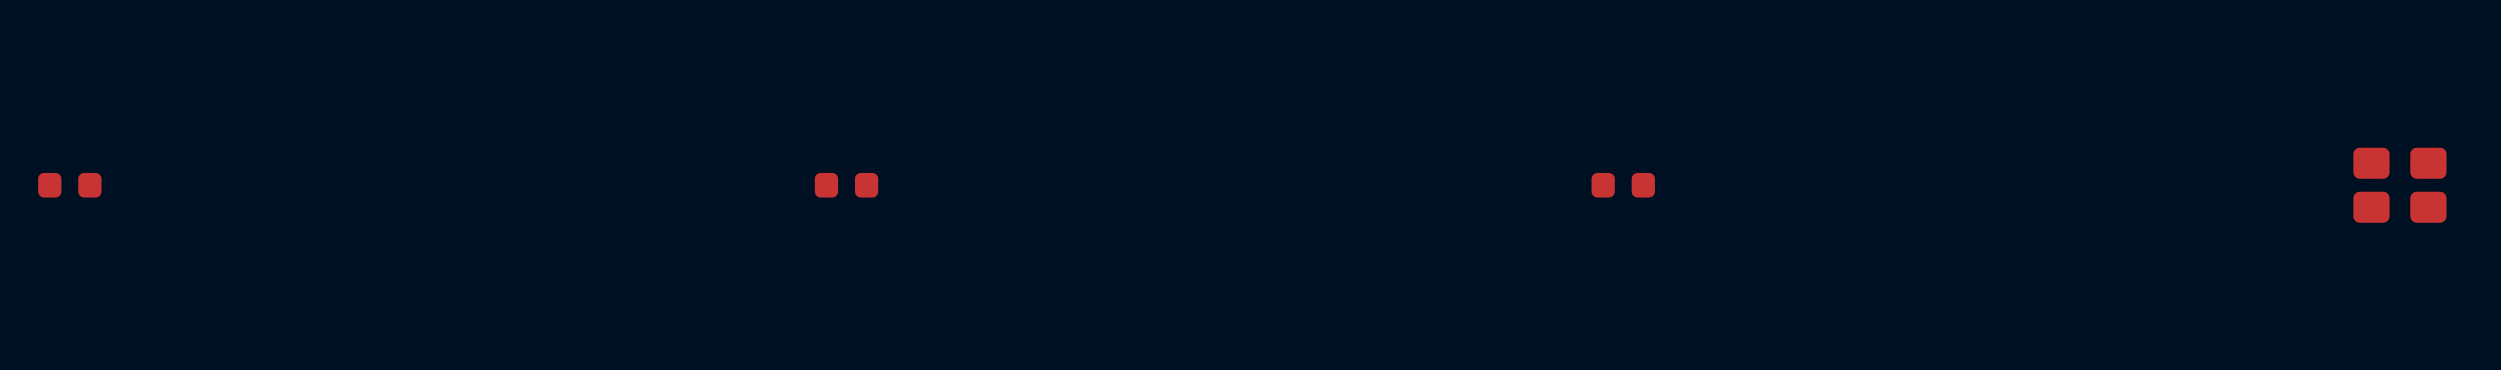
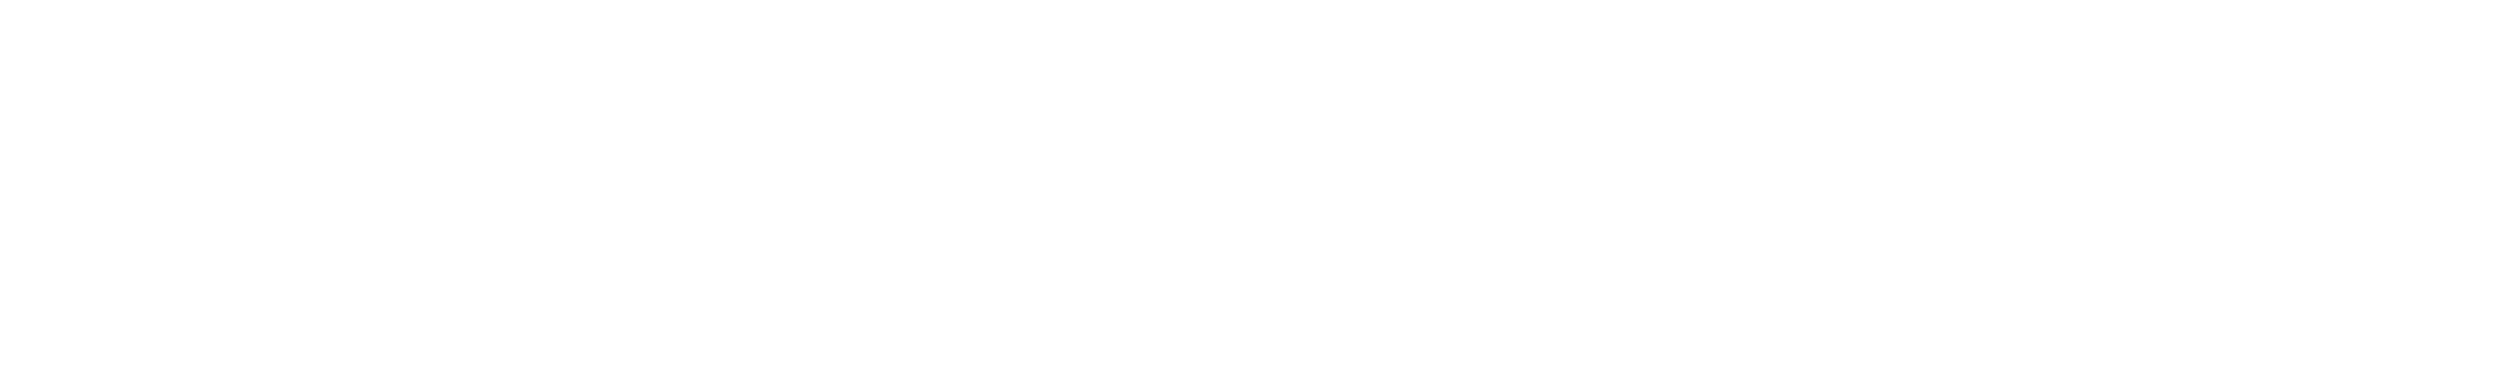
part: (69, 185) -> none
part: (846, 185) -> none
part: (1623, 185) -> none
part: (2399, 185) -> none

